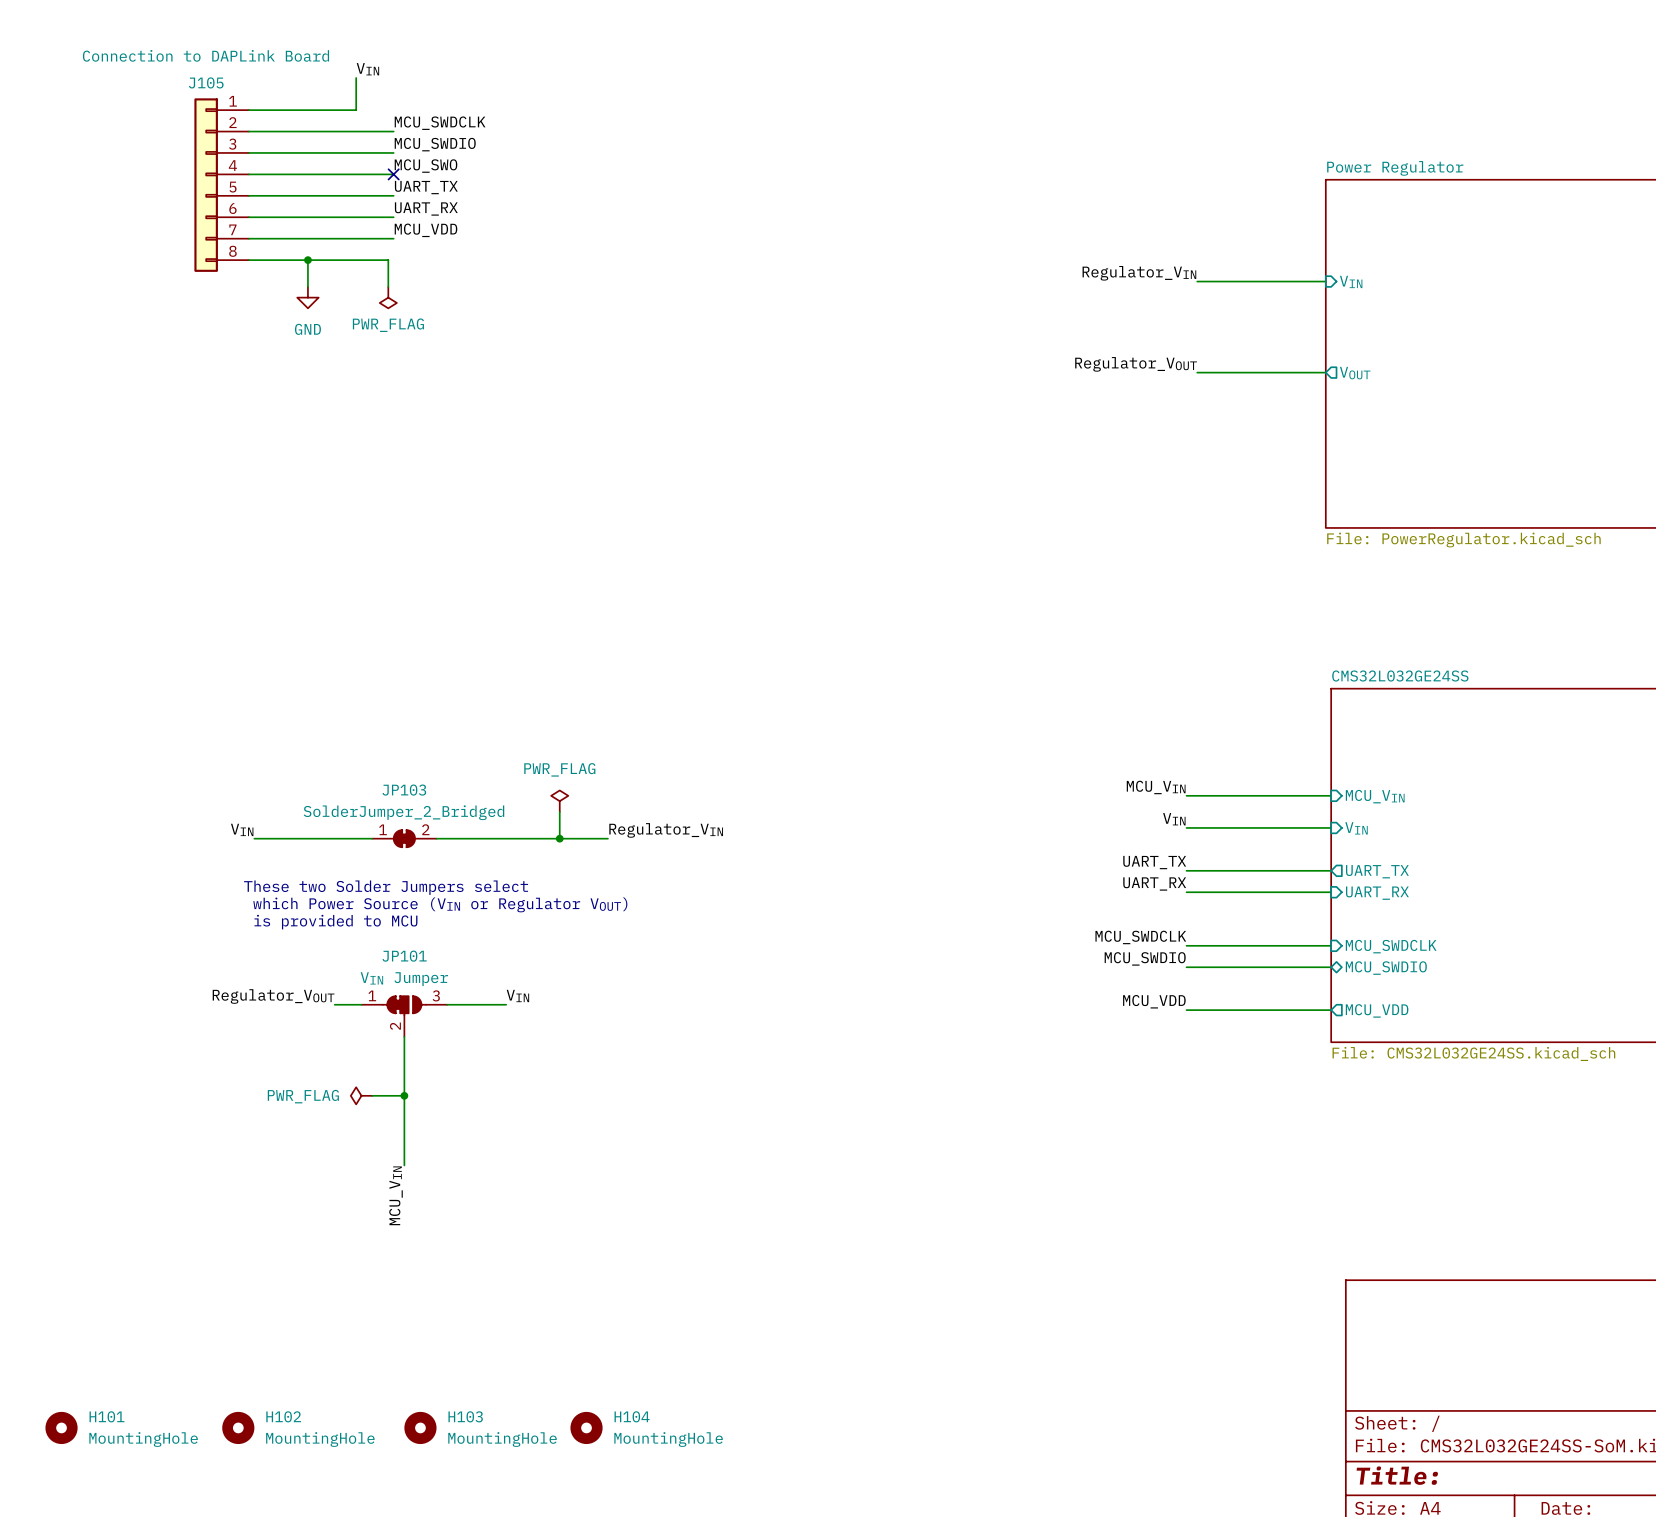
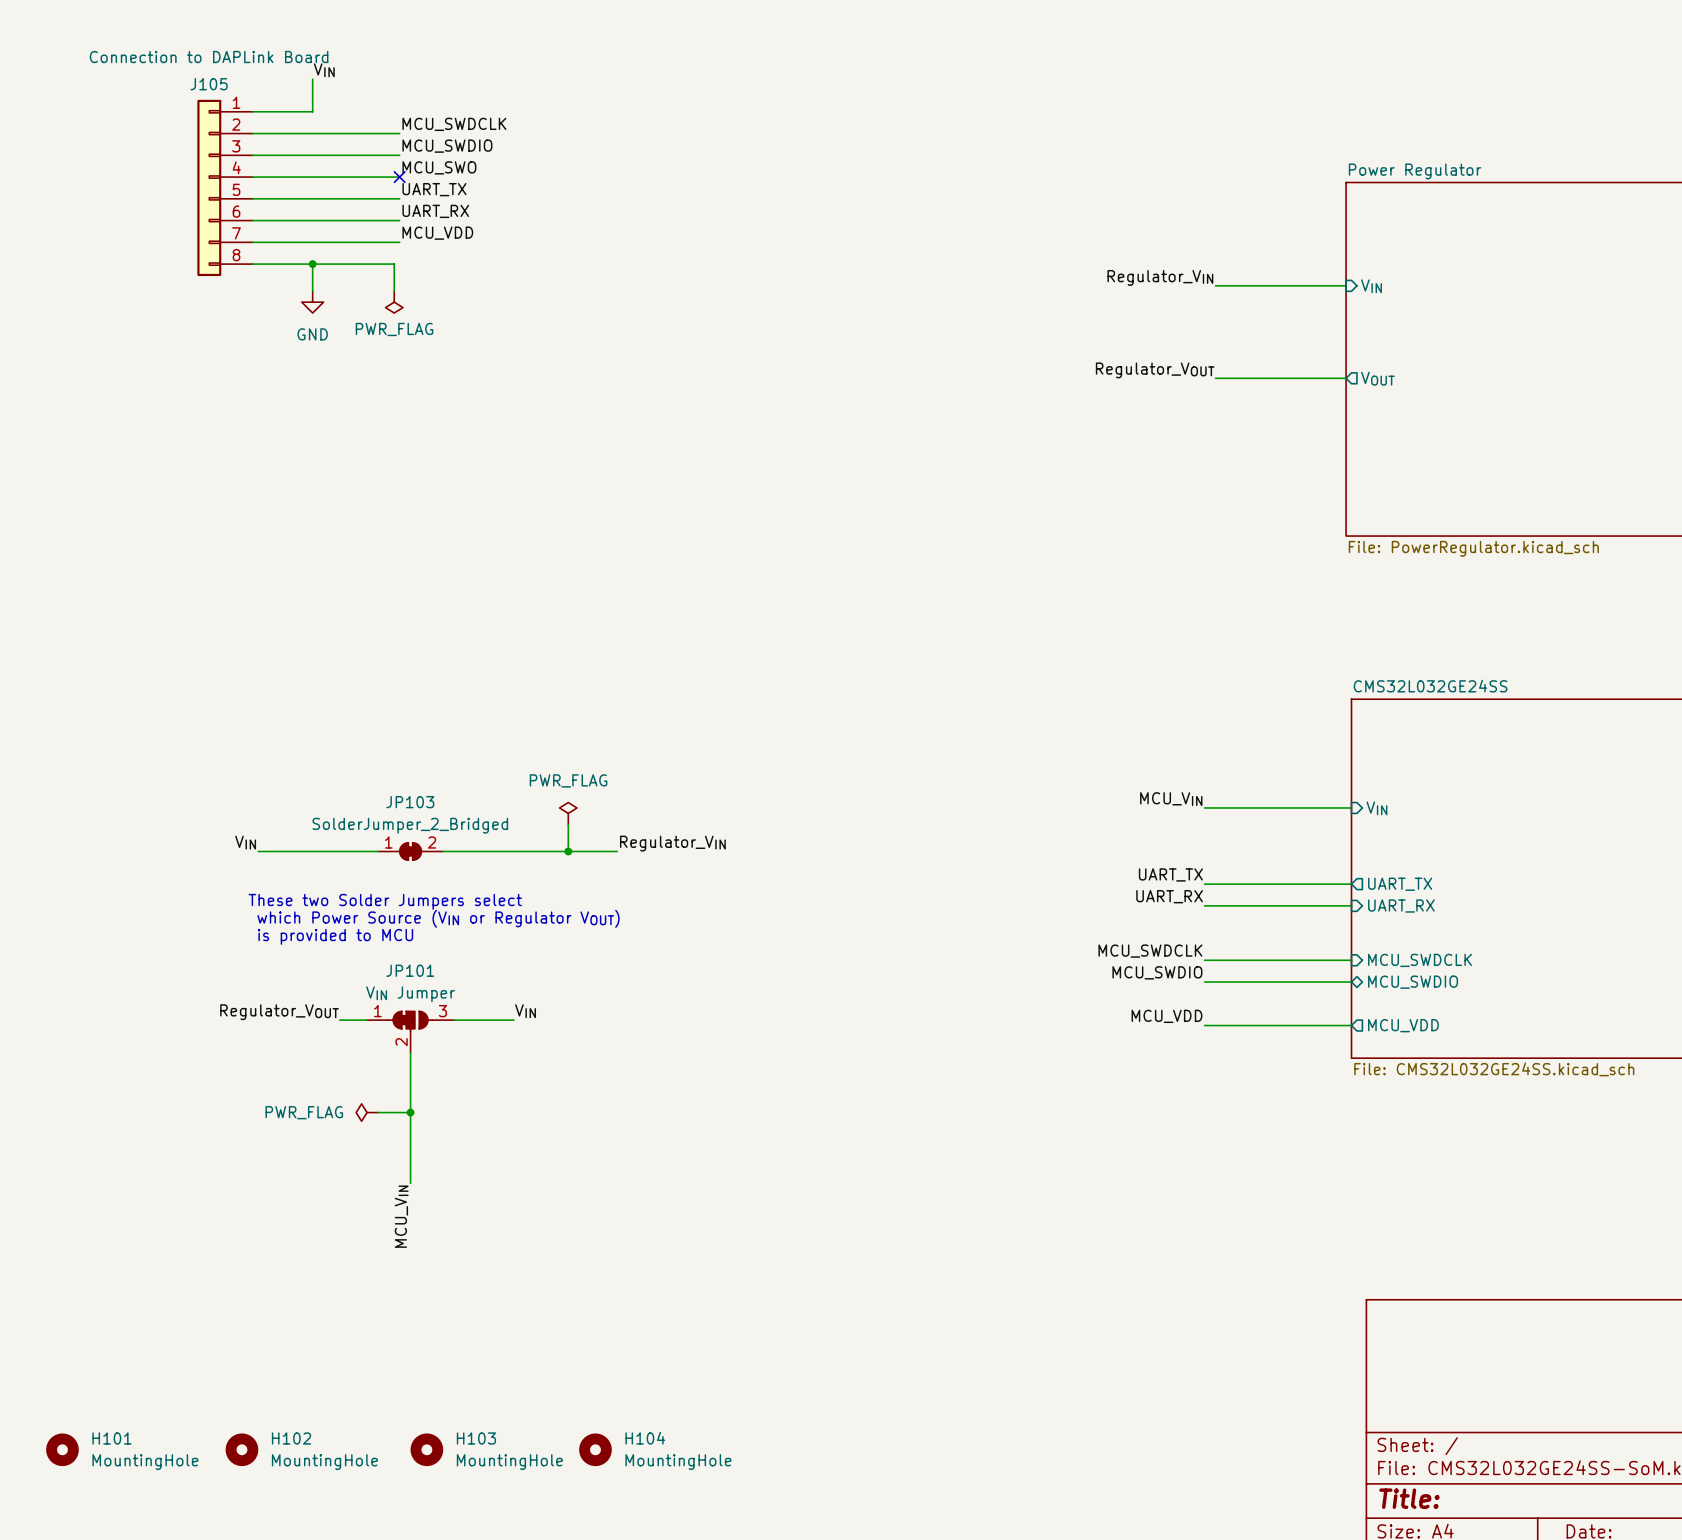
label position: VIN (367, 69) -> VIN (324, 70)
wire: (356, 77) (356, 110) (307, 110) -> (312, 79) (312, 111)
sheet pin: MCU_VIN (1375, 796) -> VIN (1376, 808)
label: VIN (1174, 819) -> none
wire: (1186, 827) (1331, 827) -> none
sheet pin: VIN (1356, 828) -> none

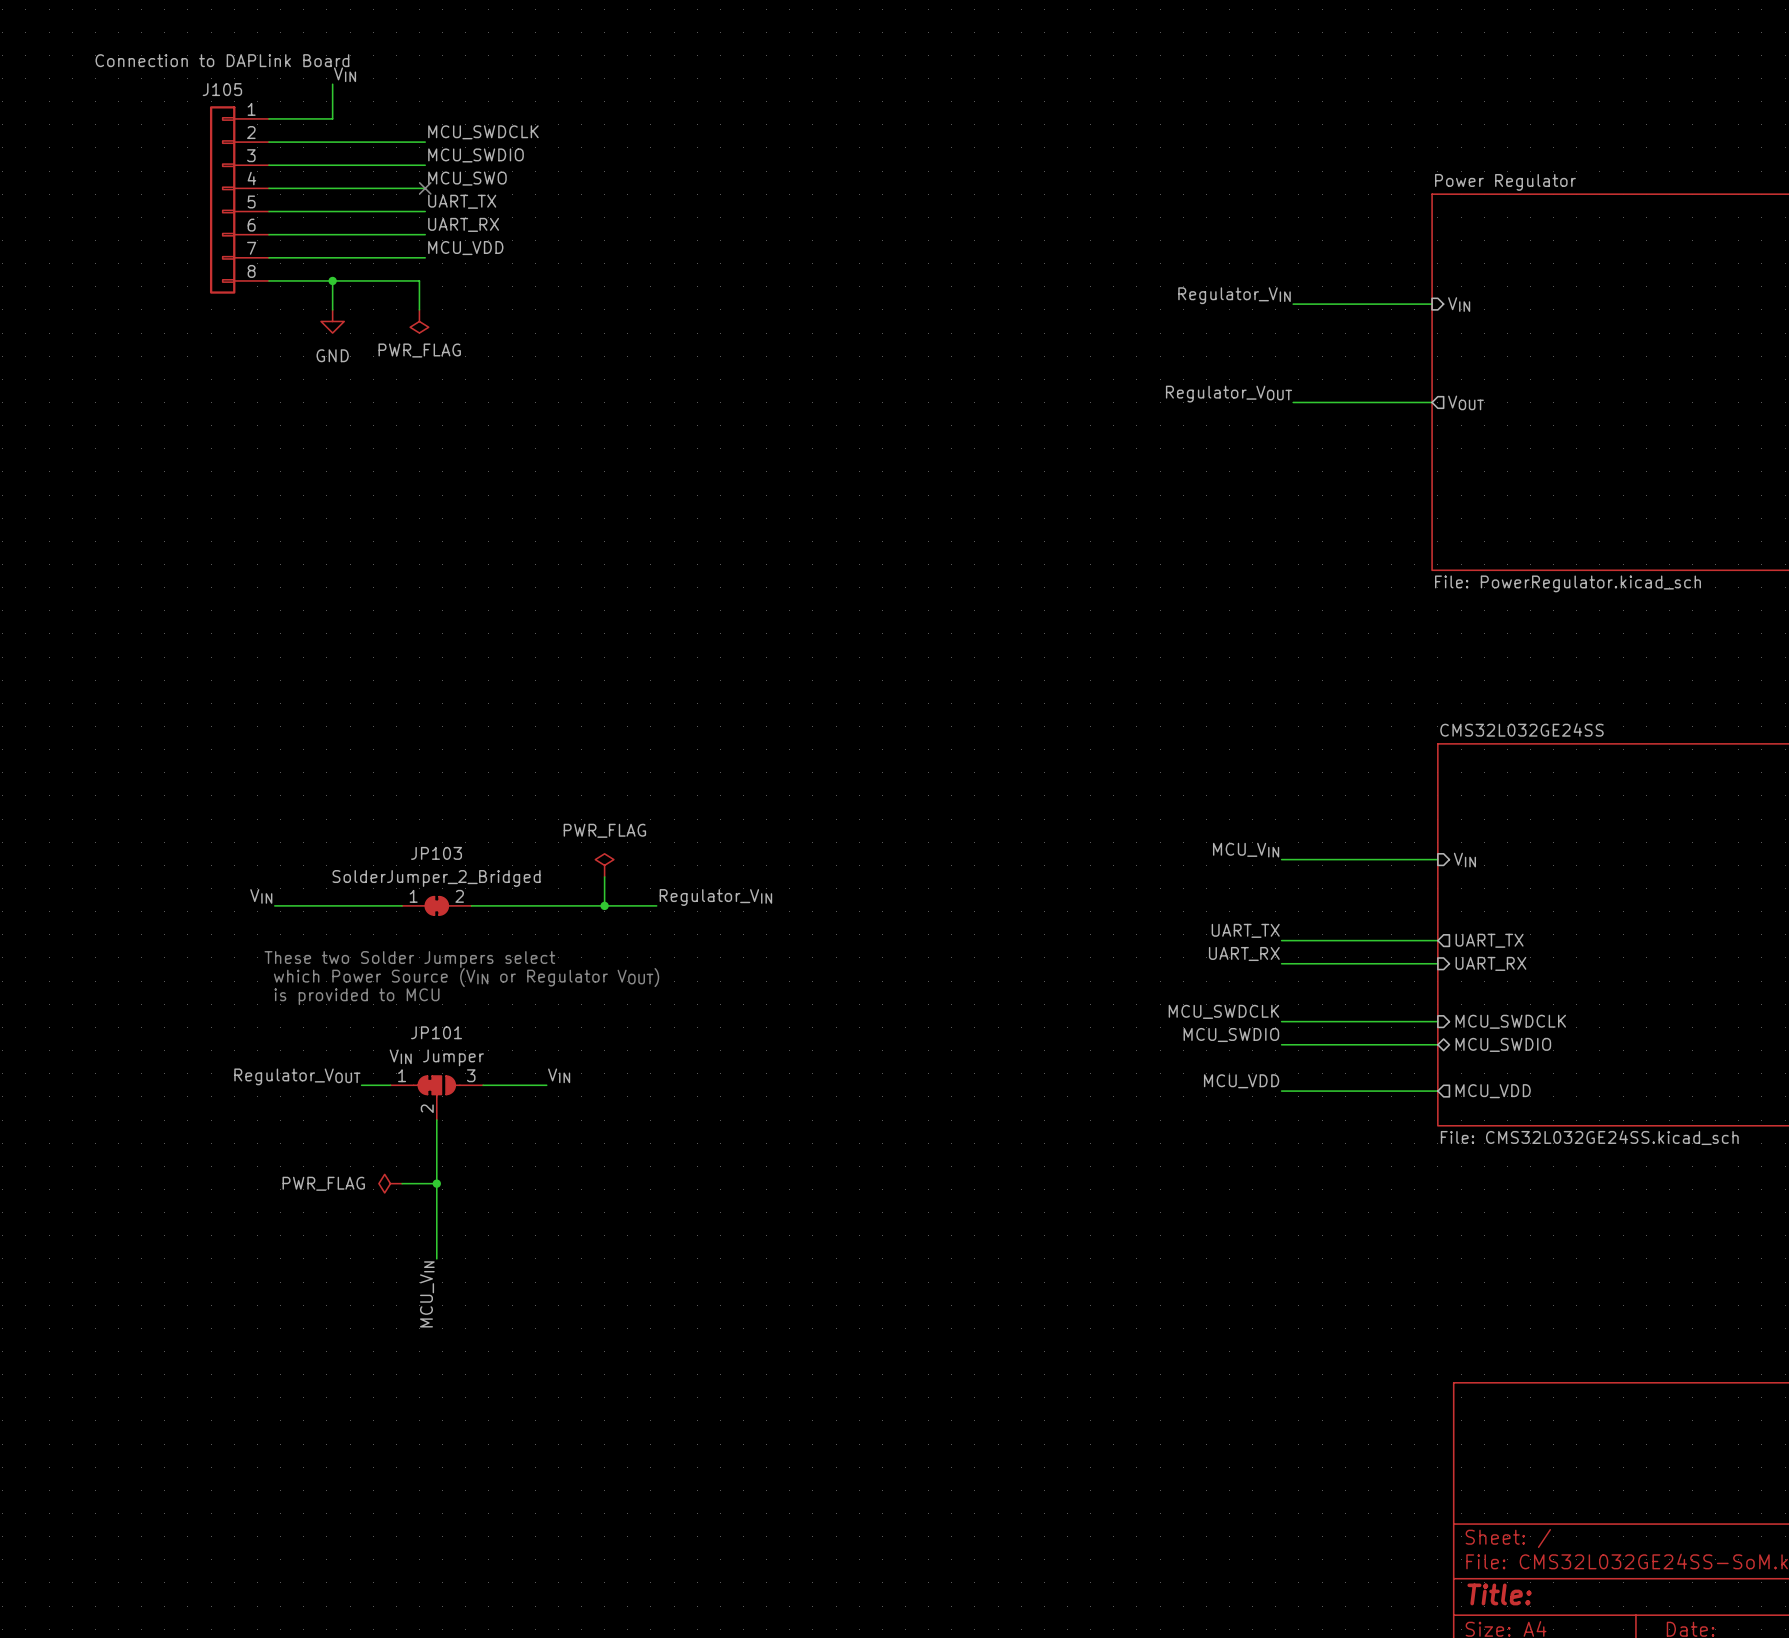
H101: MountingHole (62, 1449) -> none
H102: MountingHole (241, 1449) -> none
H103: MountingHole (426, 1449) -> none
H104: MountingHole (595, 1449) -> none

